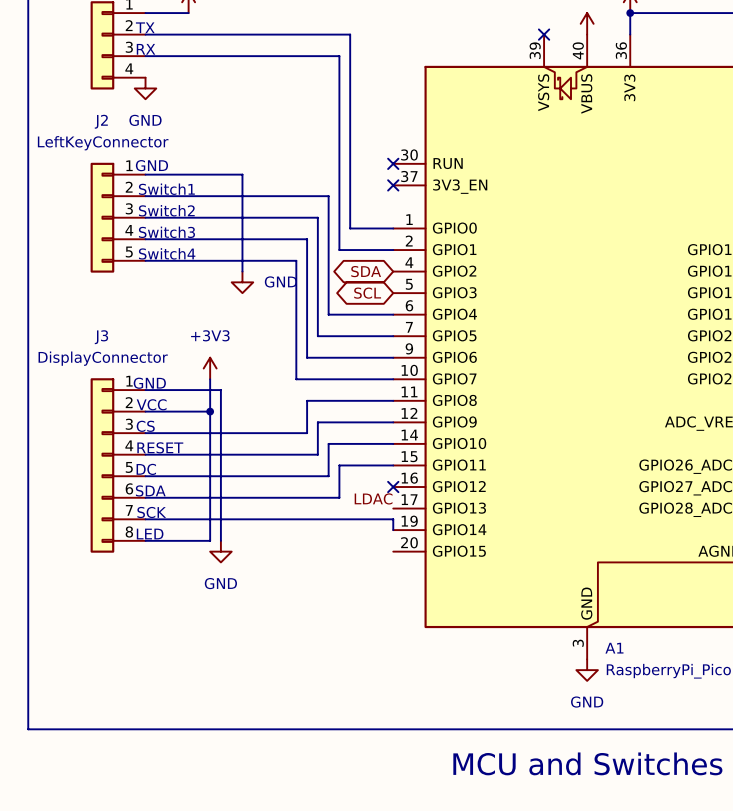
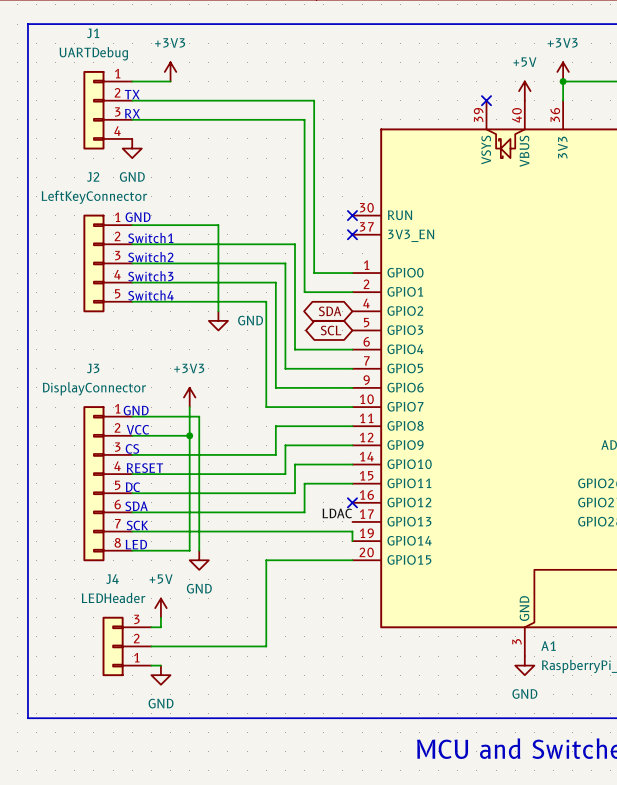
wire: none -> (352, 560) (266, 560) (266, 646) (151, 646)
power symbol: none -> +5V (160, 608)
wire: none -> (160, 617) (160, 627) (151, 627)
J4: none -> LEDHeader (126, 646)
wire: none -> (151, 665) (160, 665)
power symbol: none -> GND (160, 675)

